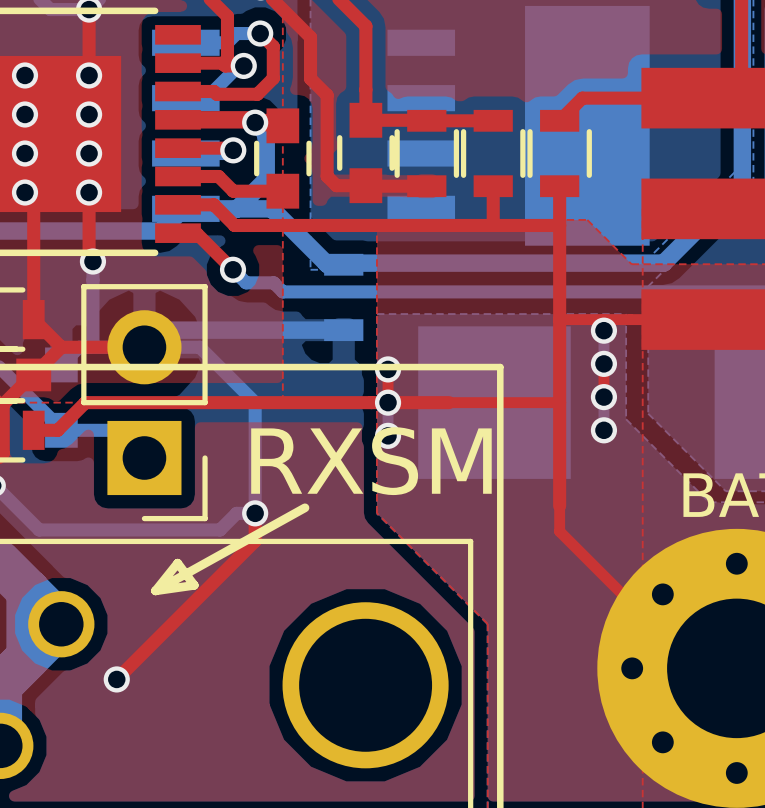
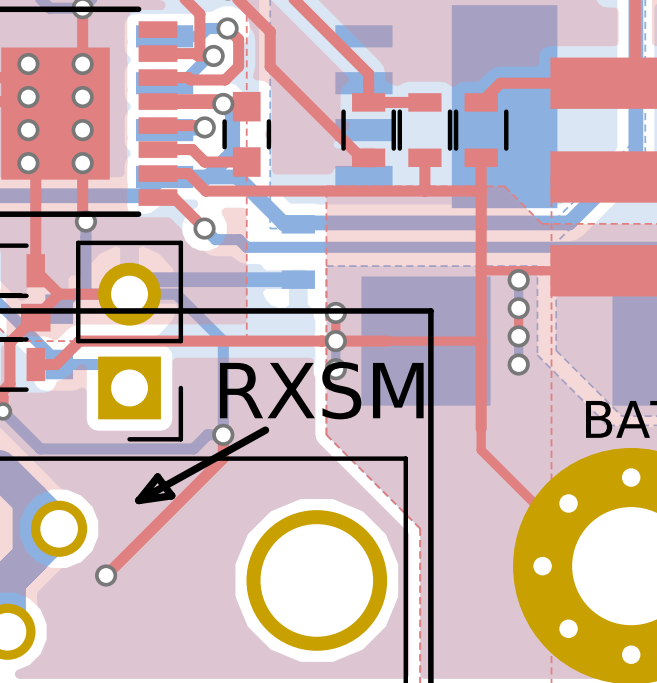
top track: (365, 26) (365, 120) (426, 120) -> (317, 22) (368, 73) (368, 102)
top track: (327, 95) (327, 176) (336, 185) (365, 185) -> (284, 80) (361, 157)
part: (365, 152) -> none
top track: (366, 186) (418, 186) -> none

